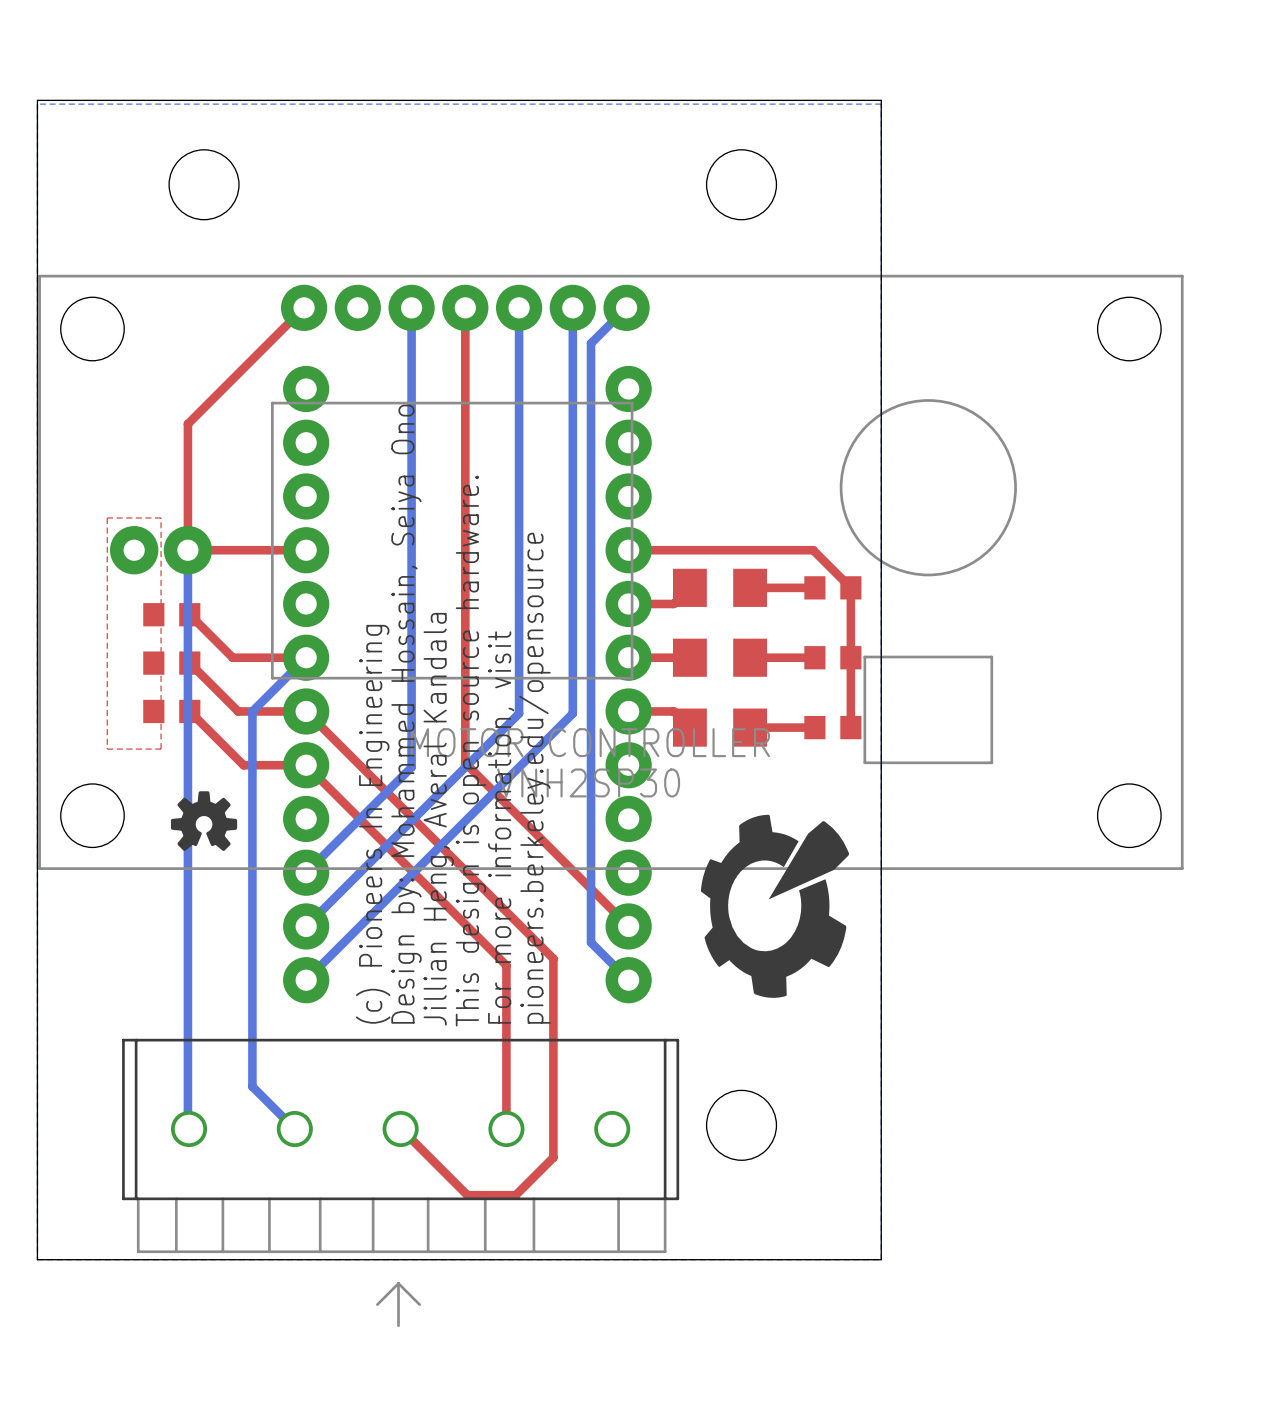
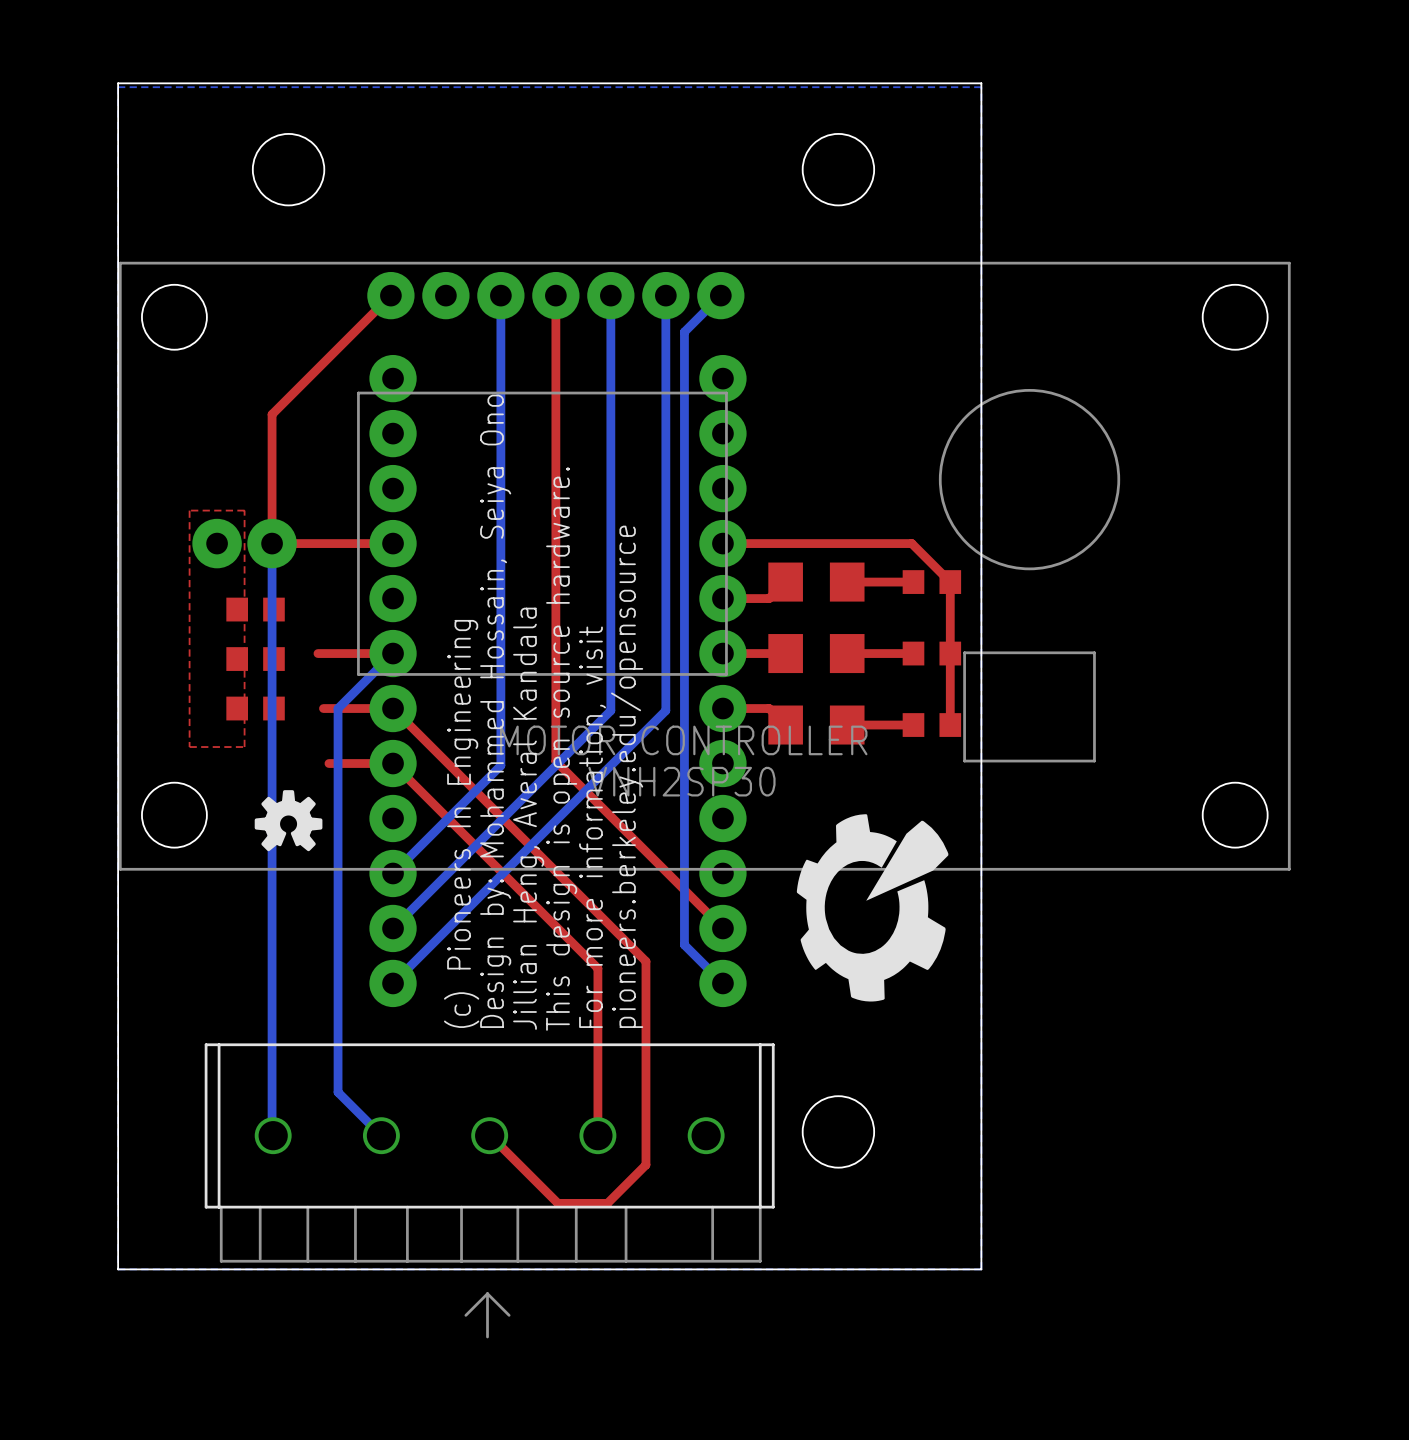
top track: (189, 614) (232, 657) -> none
top track: (189, 663) (238, 711) -> none
top track: (189, 711) (243, 765) -> none

